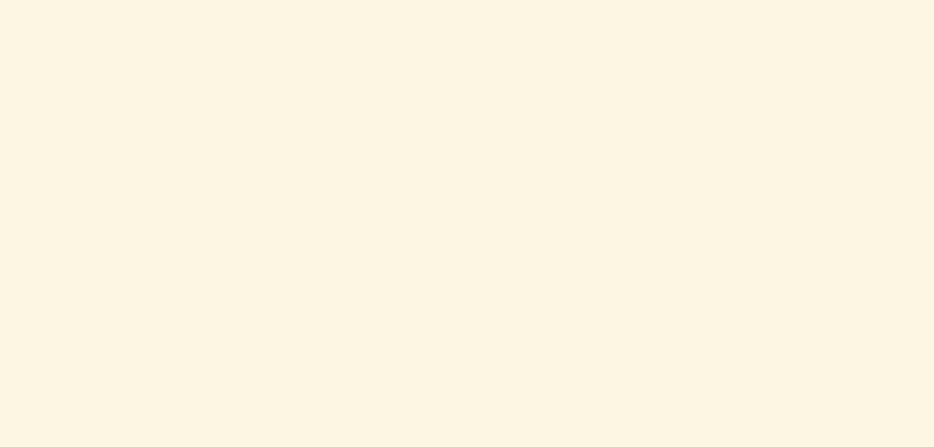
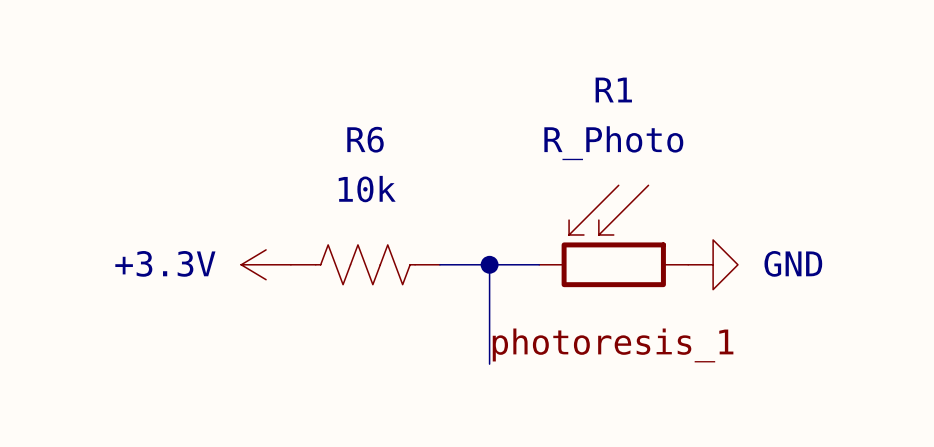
R1: none -> R_Photo (613, 236)
power symbol: none -> +3.3V (266, 264)
R6: none -> 10k (365, 264)
wire: none -> (439, 264) (539, 264)
wire: none -> (489, 264) (489, 364)
junction: none -> (489, 264)
power symbol: none -> GND (713, 264)
label: none -> photoresis_1 (613, 345)

